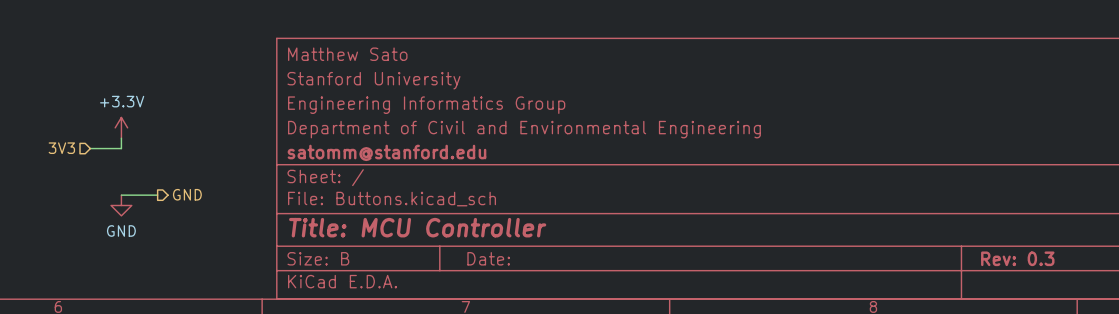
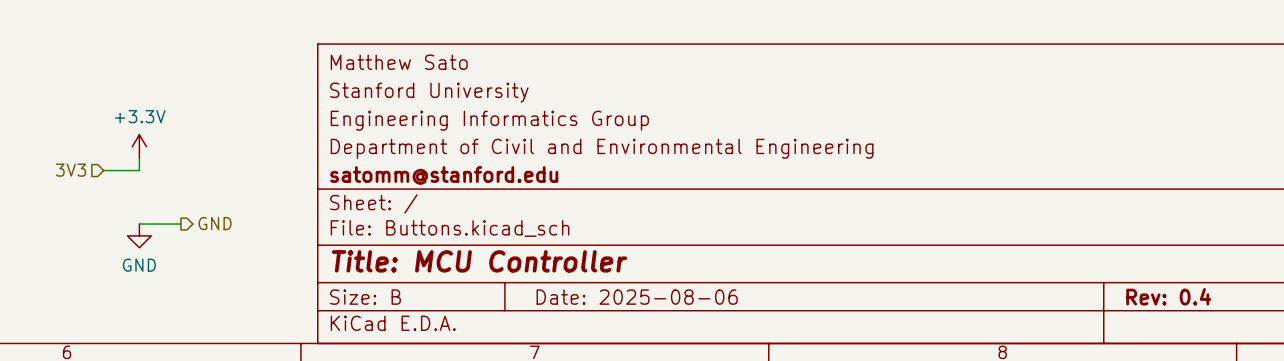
title block: Date: (488, 258) -> Date: 2025-08-06 (637, 297)
title block: Rev: 0.3 (1017, 258) -> Rev: 0.4 (1168, 296)

